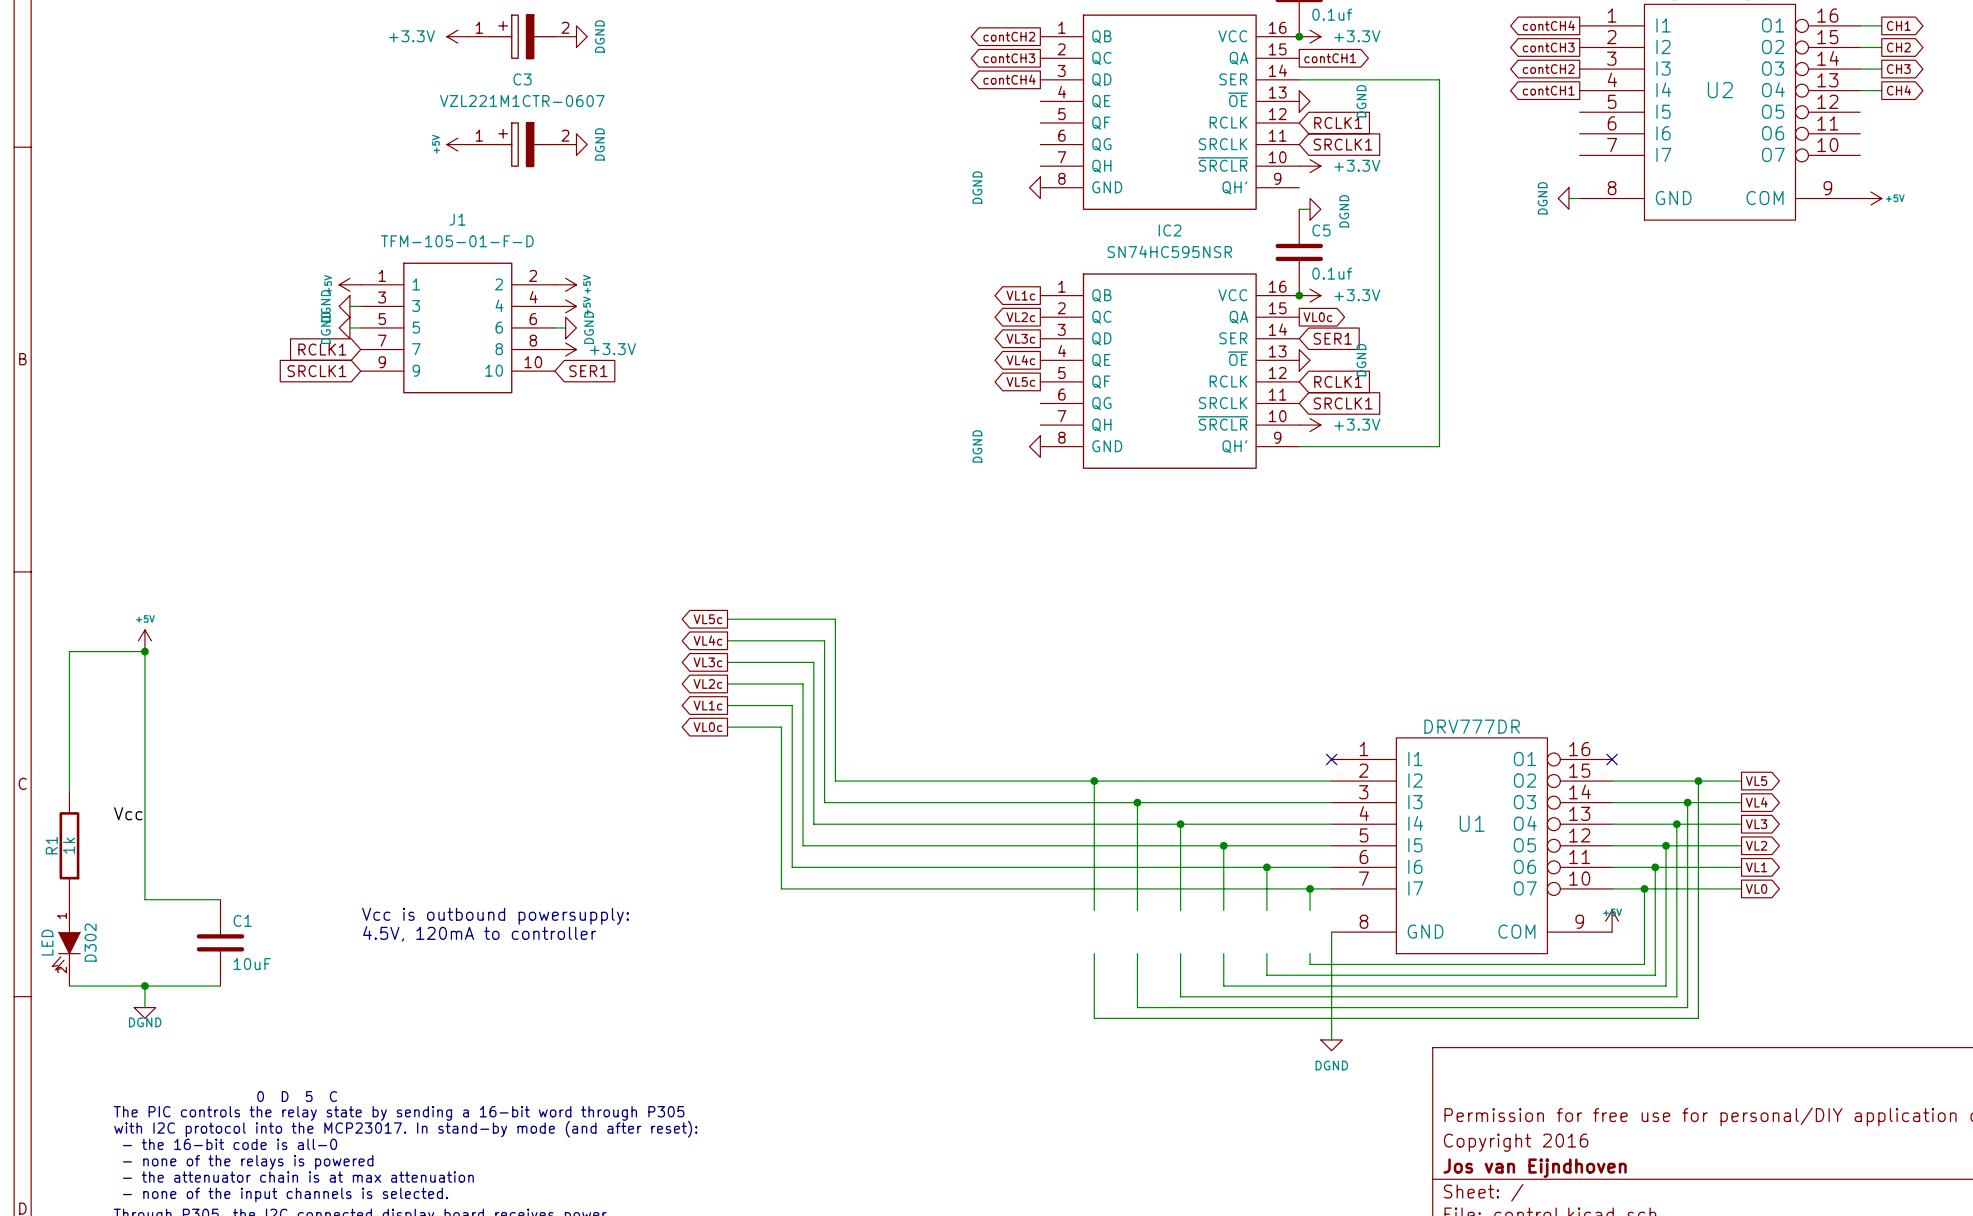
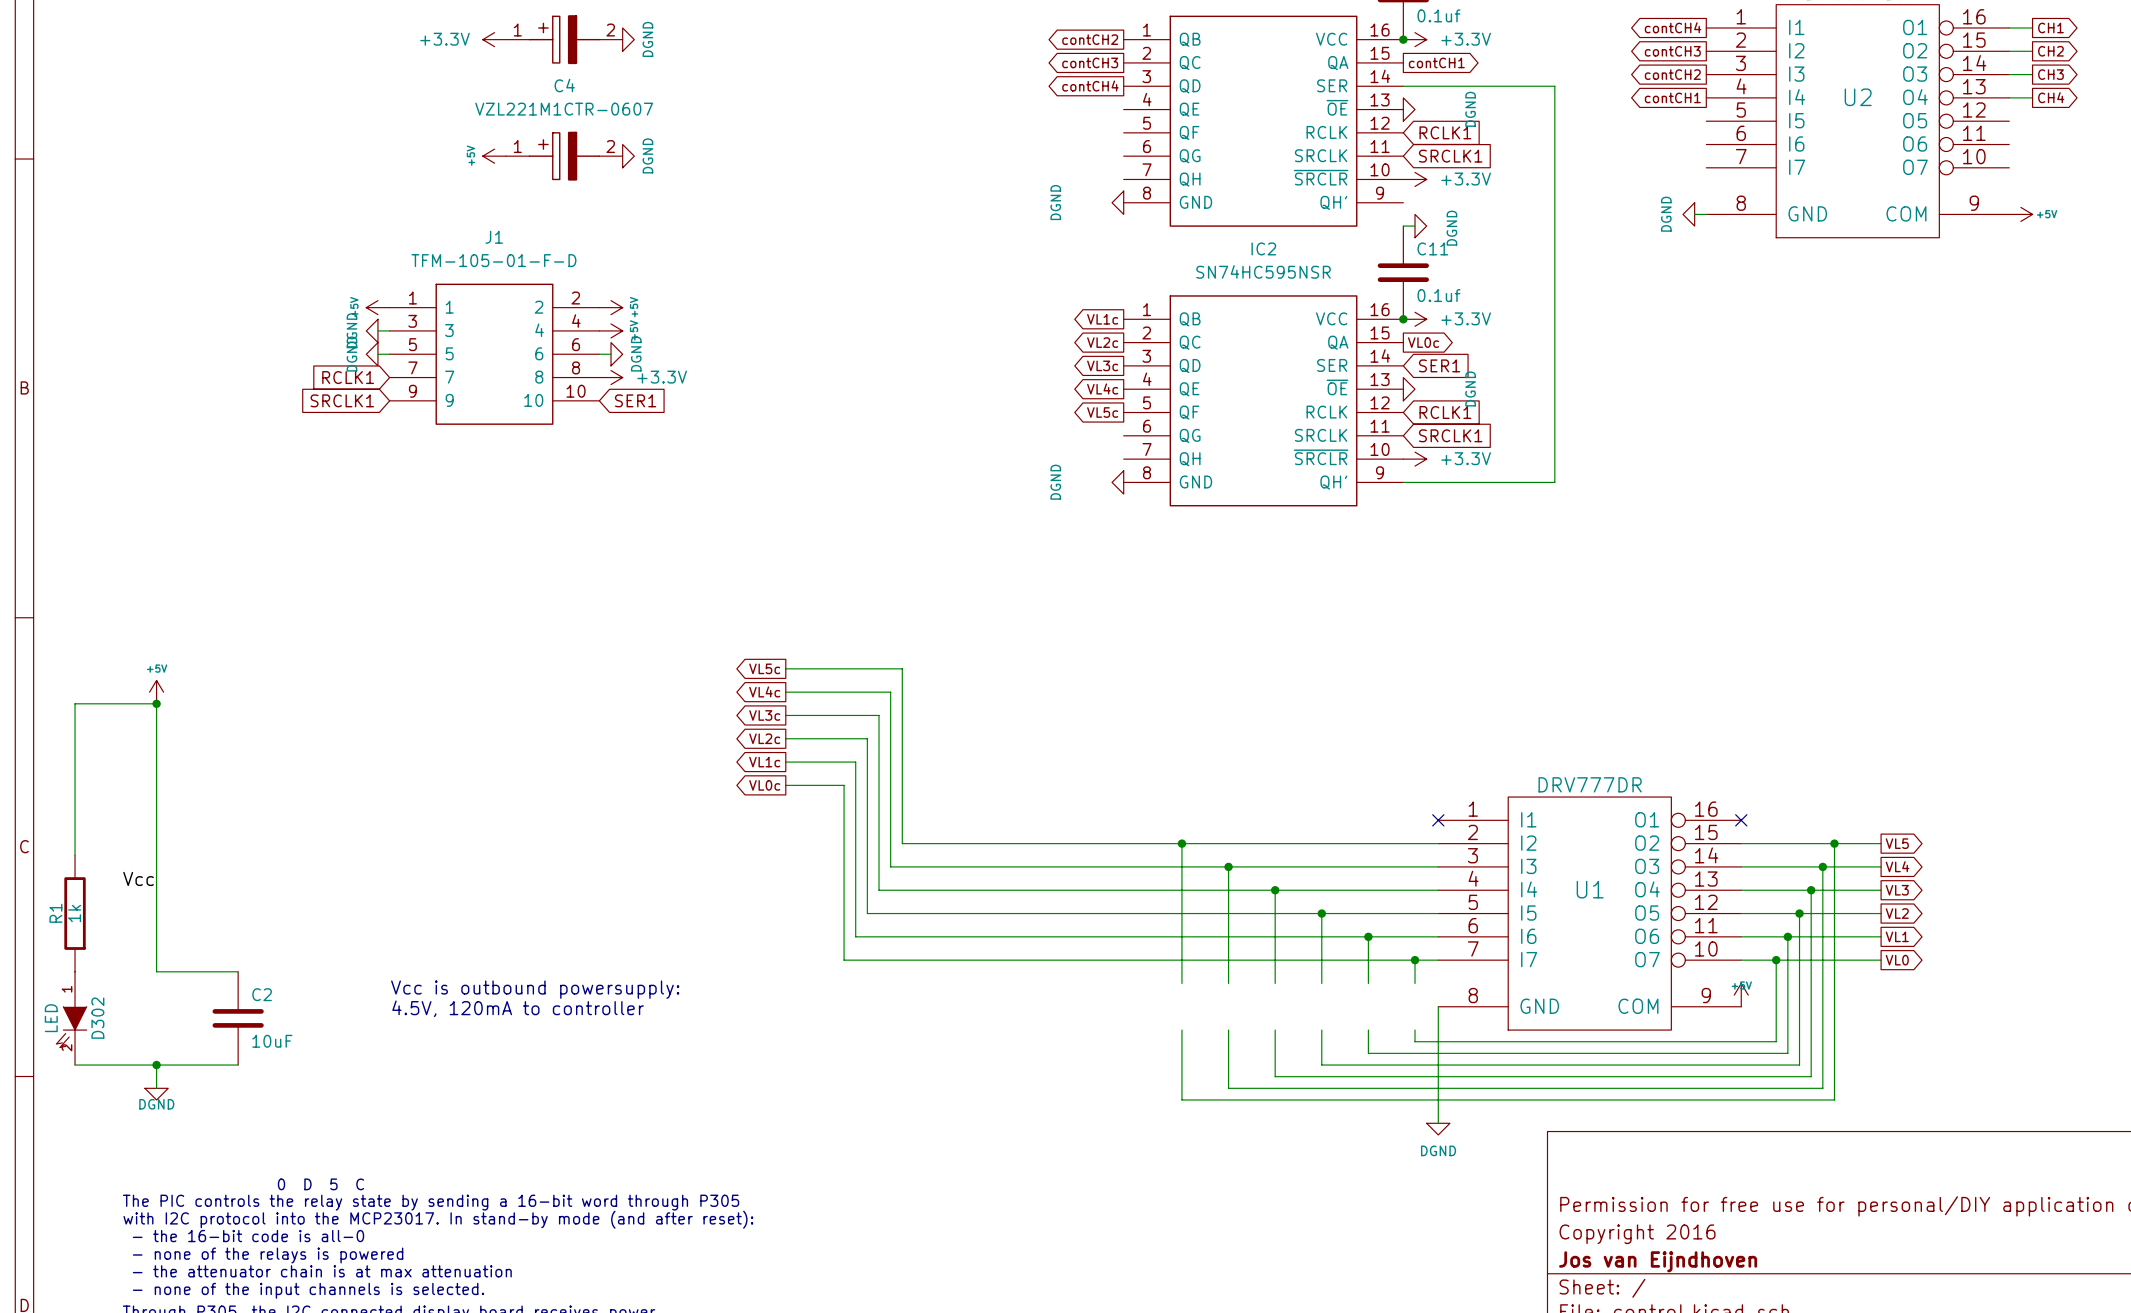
C3 name: C3 (522, 79) -> C4 (564, 85)
C5 name: C5 (1321, 230) -> C11 (1432, 248)
C1 name: C1 (242, 920) -> C2 (262, 994)

